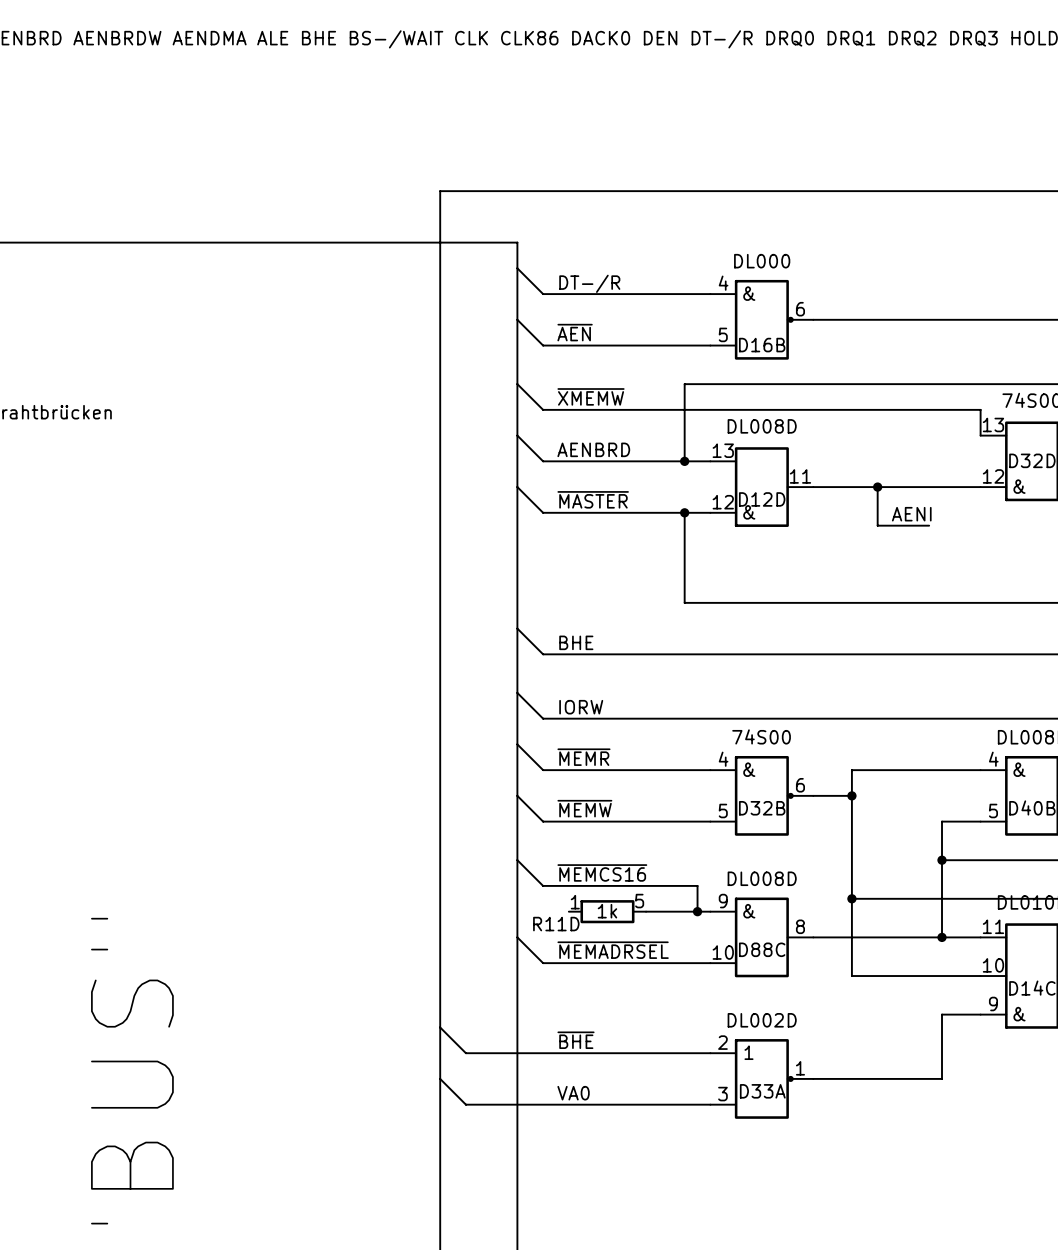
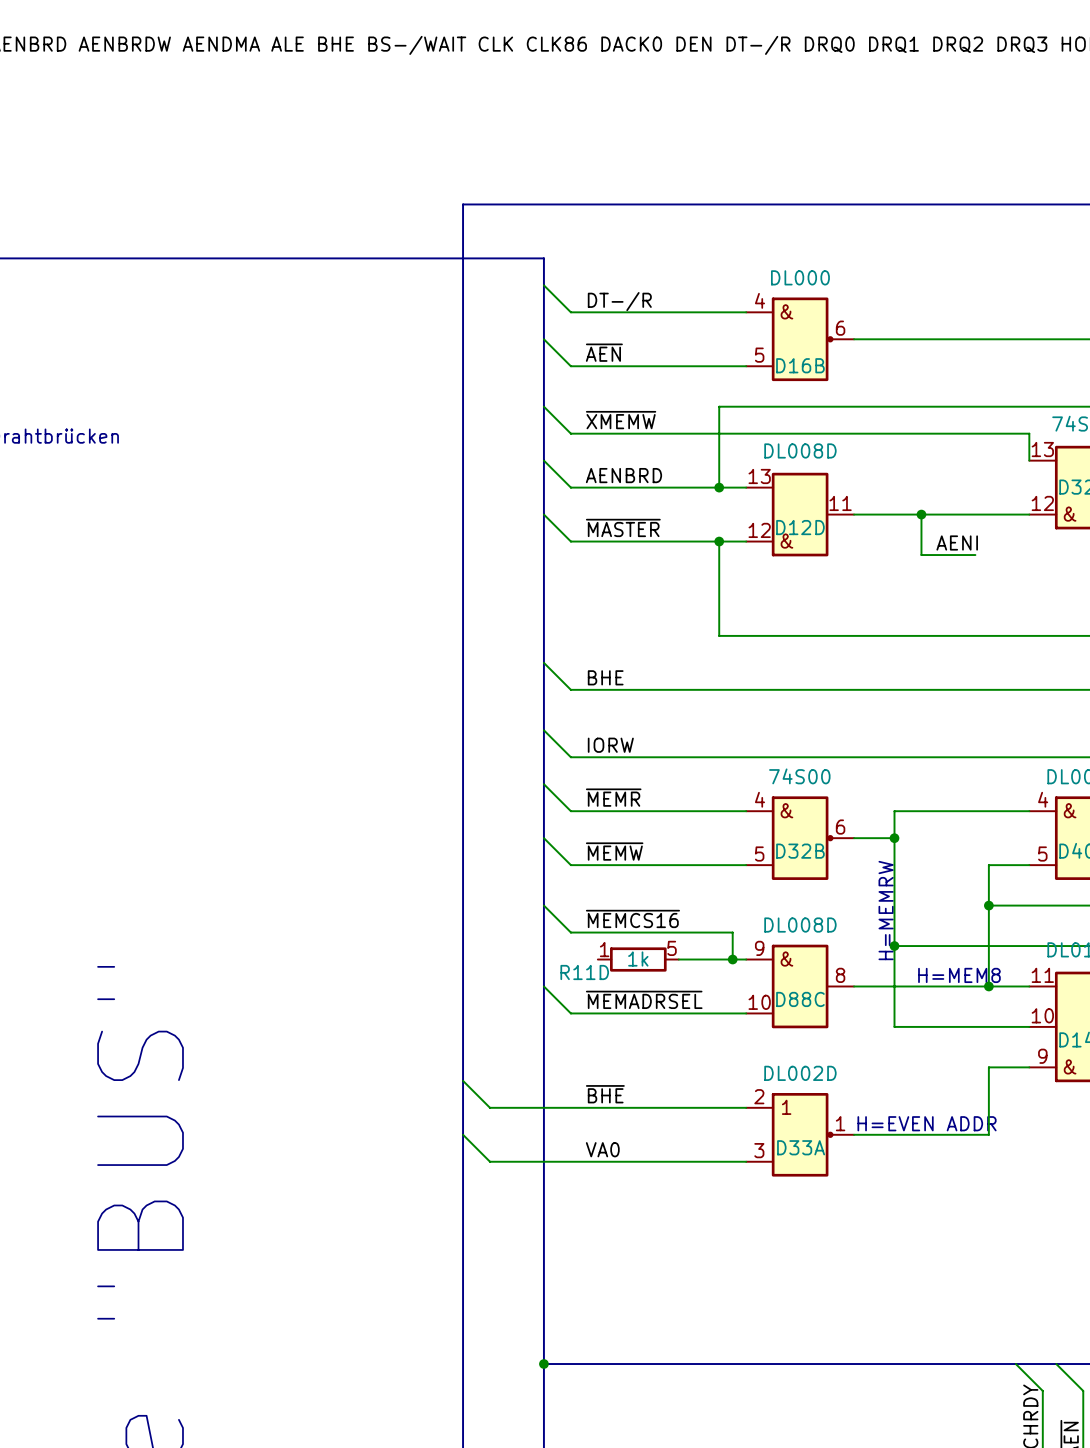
text: none -> H=MEMRW (886, 910)
text: none -> H=MEM8 (959, 975)
text: none -> H=EVEN ADDR (927, 1123)

